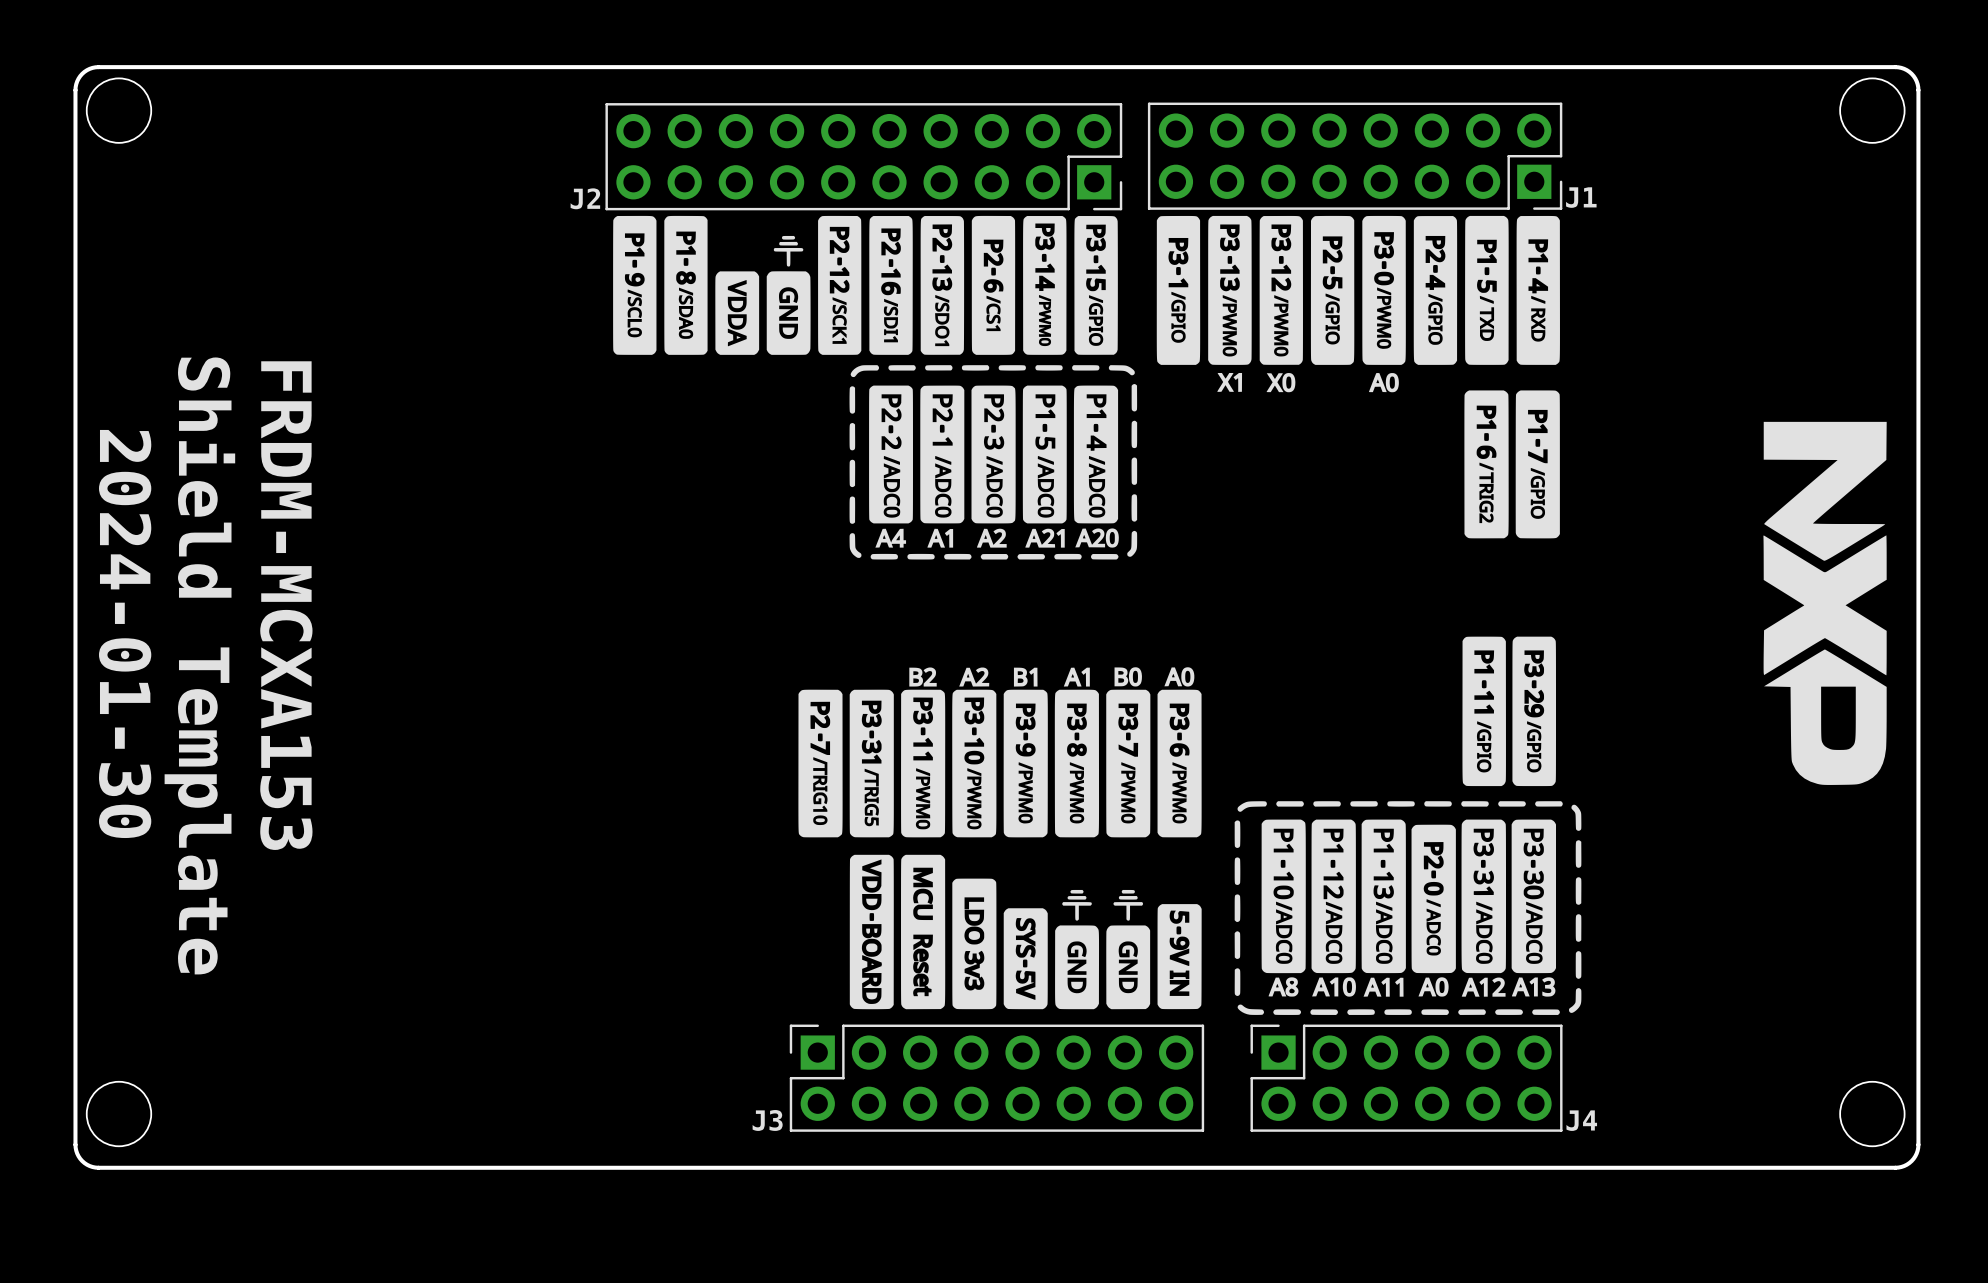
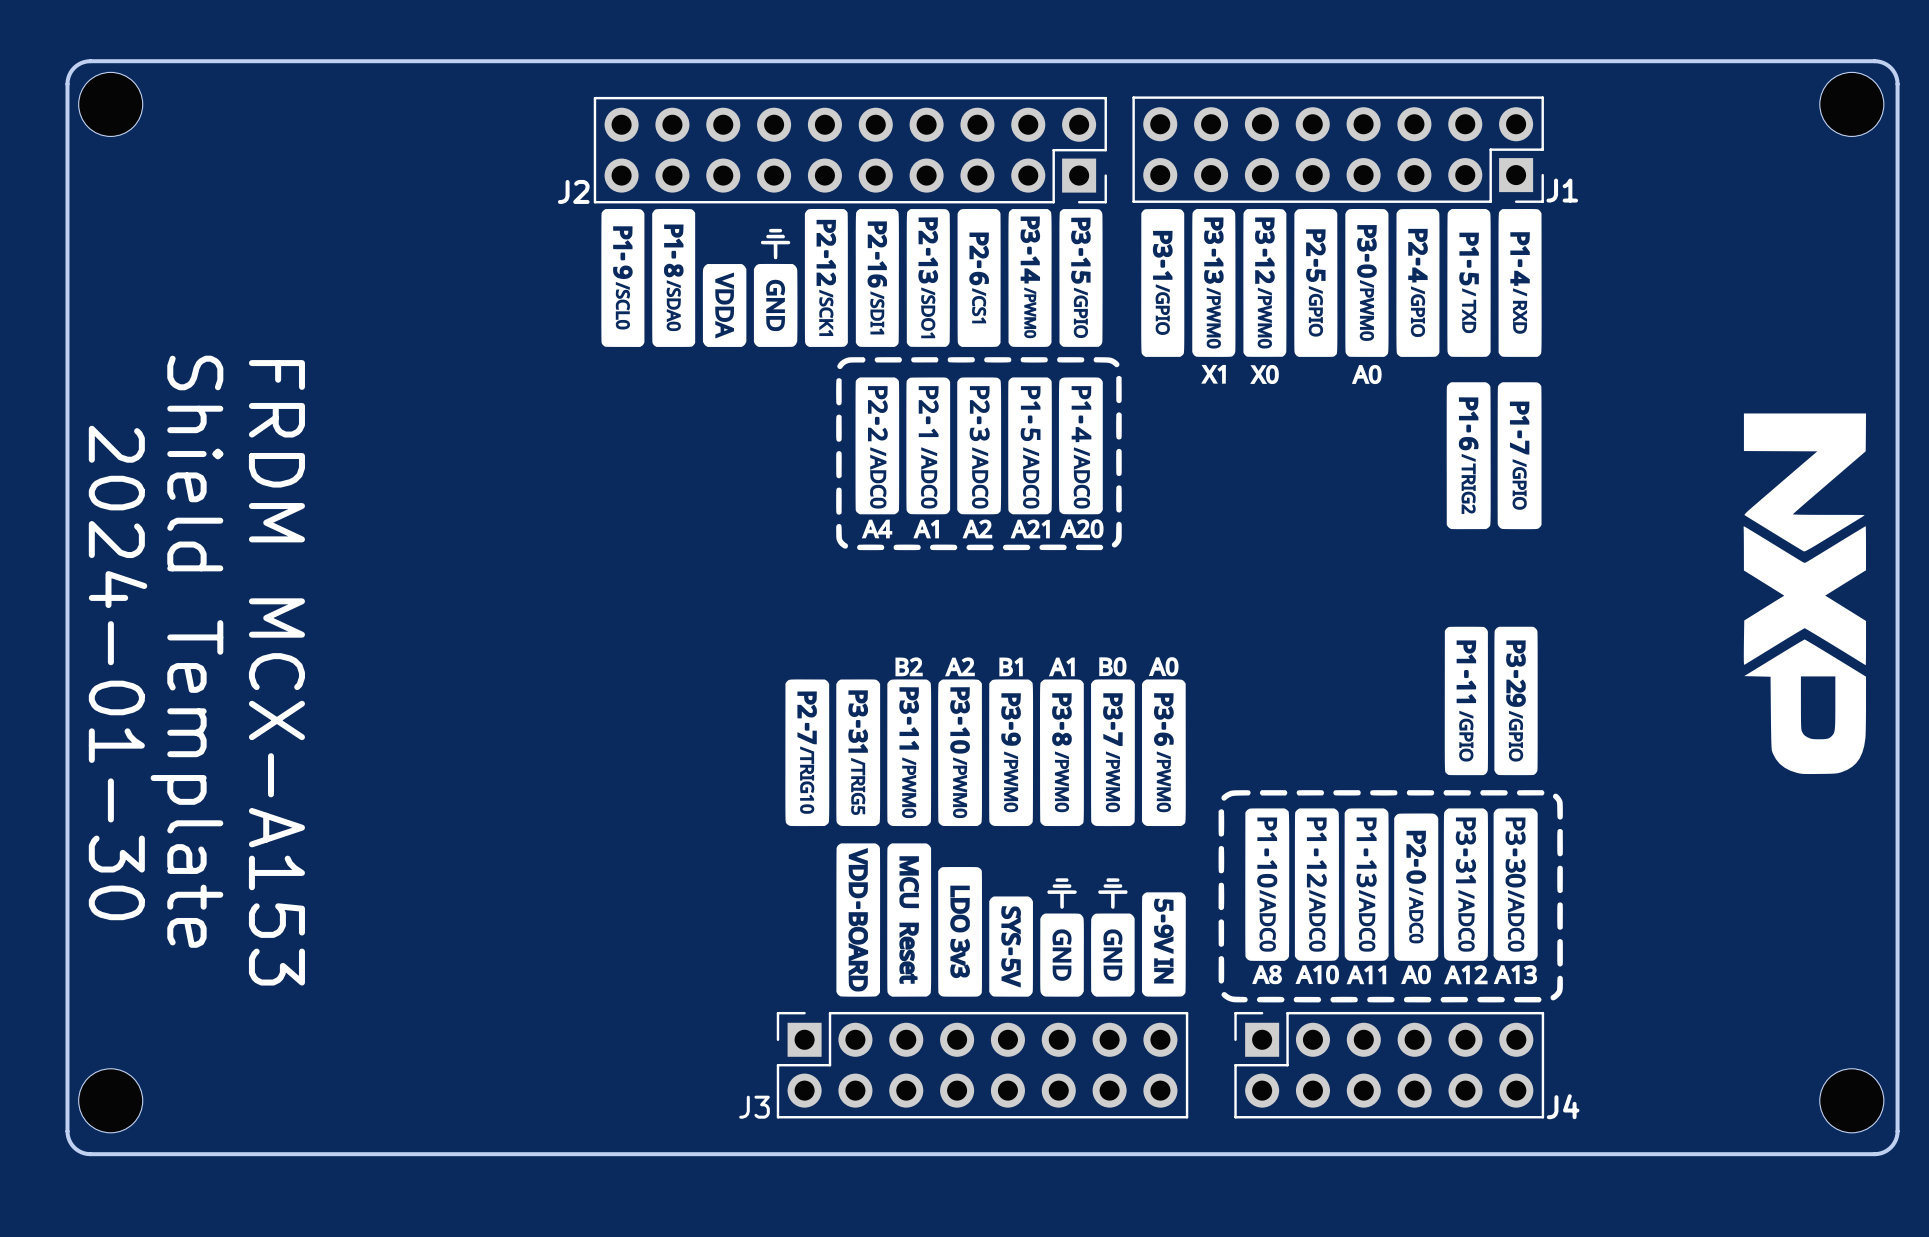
text: FRDM-MCXA153 (286, 605) -> FRDM MCX-A153 (276, 672)

